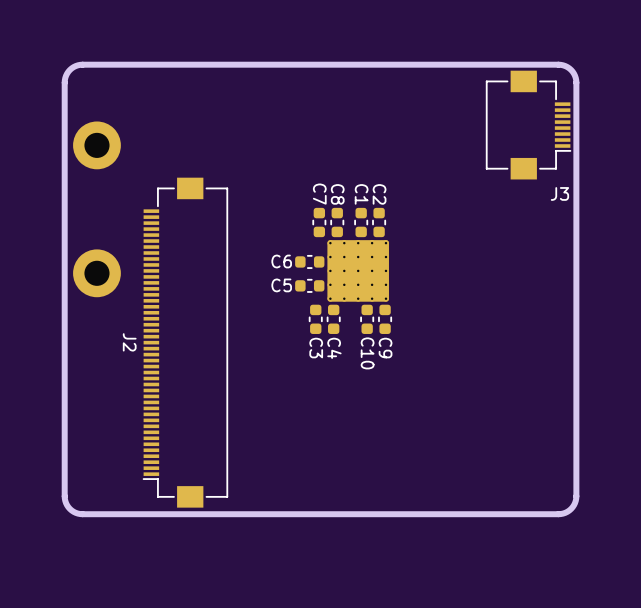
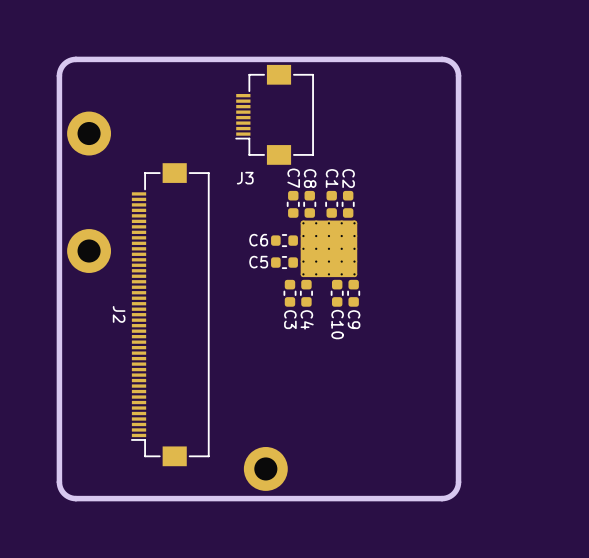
board edge: (481, 64) (560, 64) (569, 68) (575, 77) (576, 496) (571, 508) (558, 514) (82, 514) (69, 508) (64, 496) -> (442, 59) (453, 64) (458, 75) (458, 482) (453, 493) (442, 498) (73, 498) (65, 495) (59, 486) (59, 455)
J3 footprint: [485, 70, 572, 180] -> [235, 64, 314, 165]
J3 name position: J3 (559, 193) -> J3 (245, 178)
part: none -> (265, 468)

